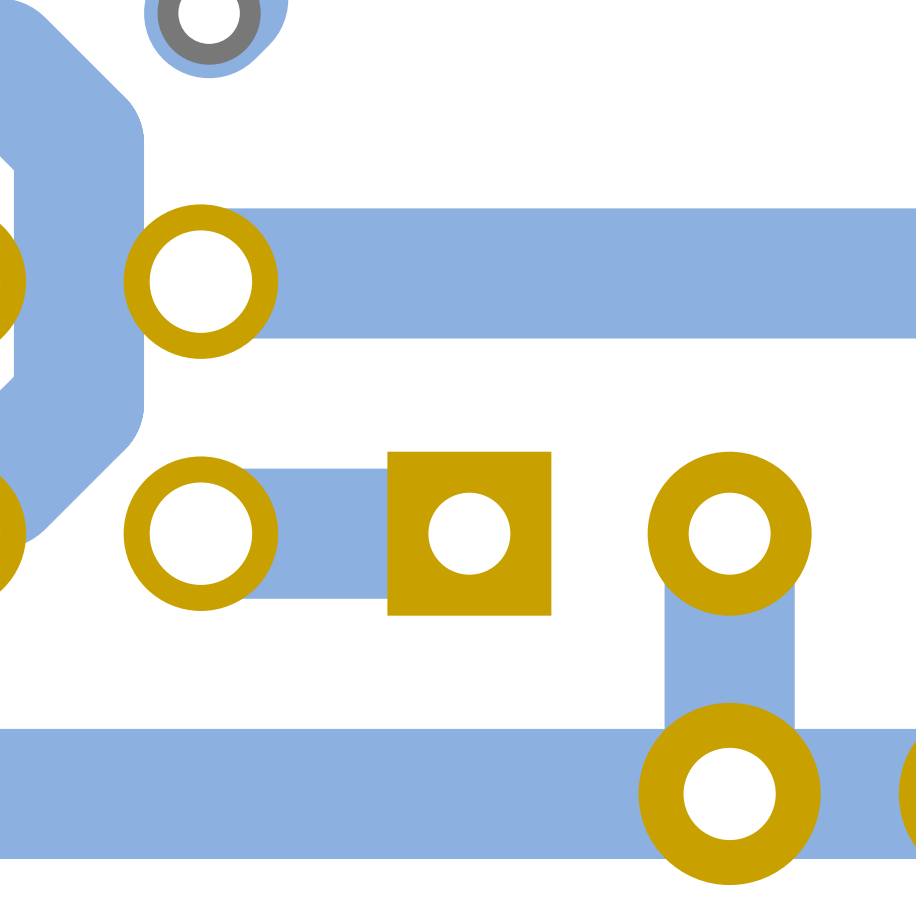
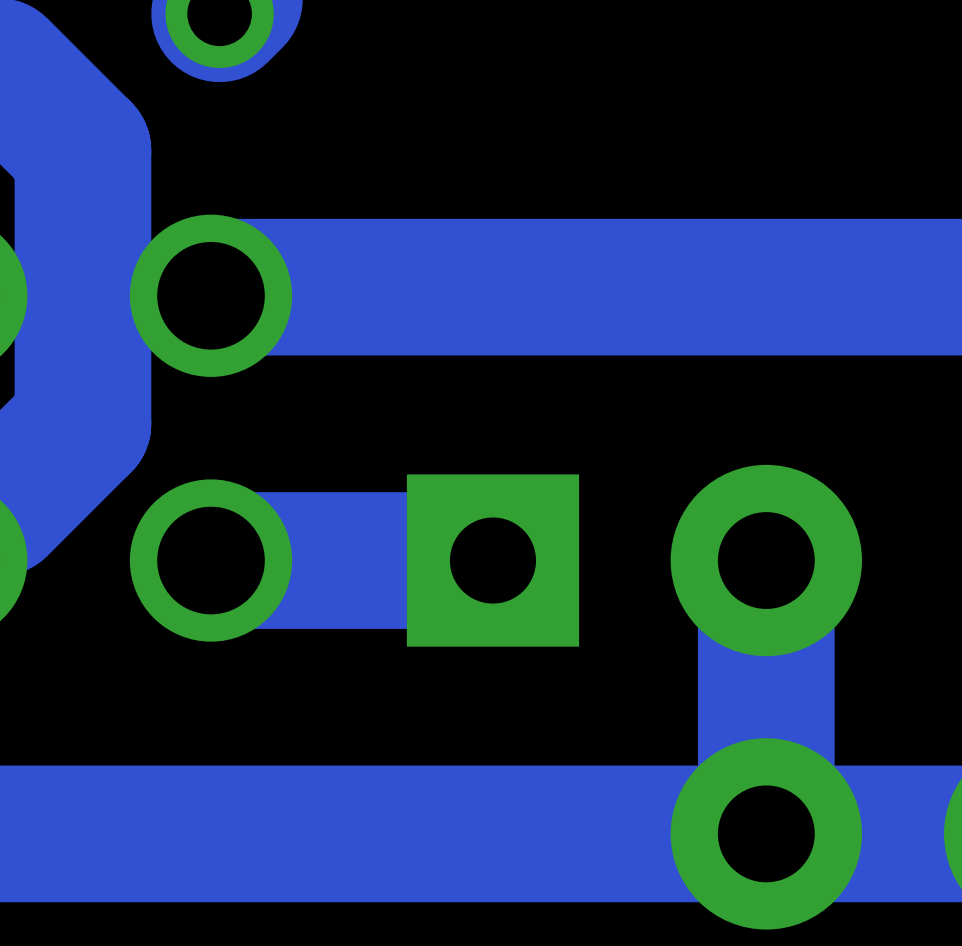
part footprint: [387, 451, 812, 616] -> [406, 464, 862, 657]

